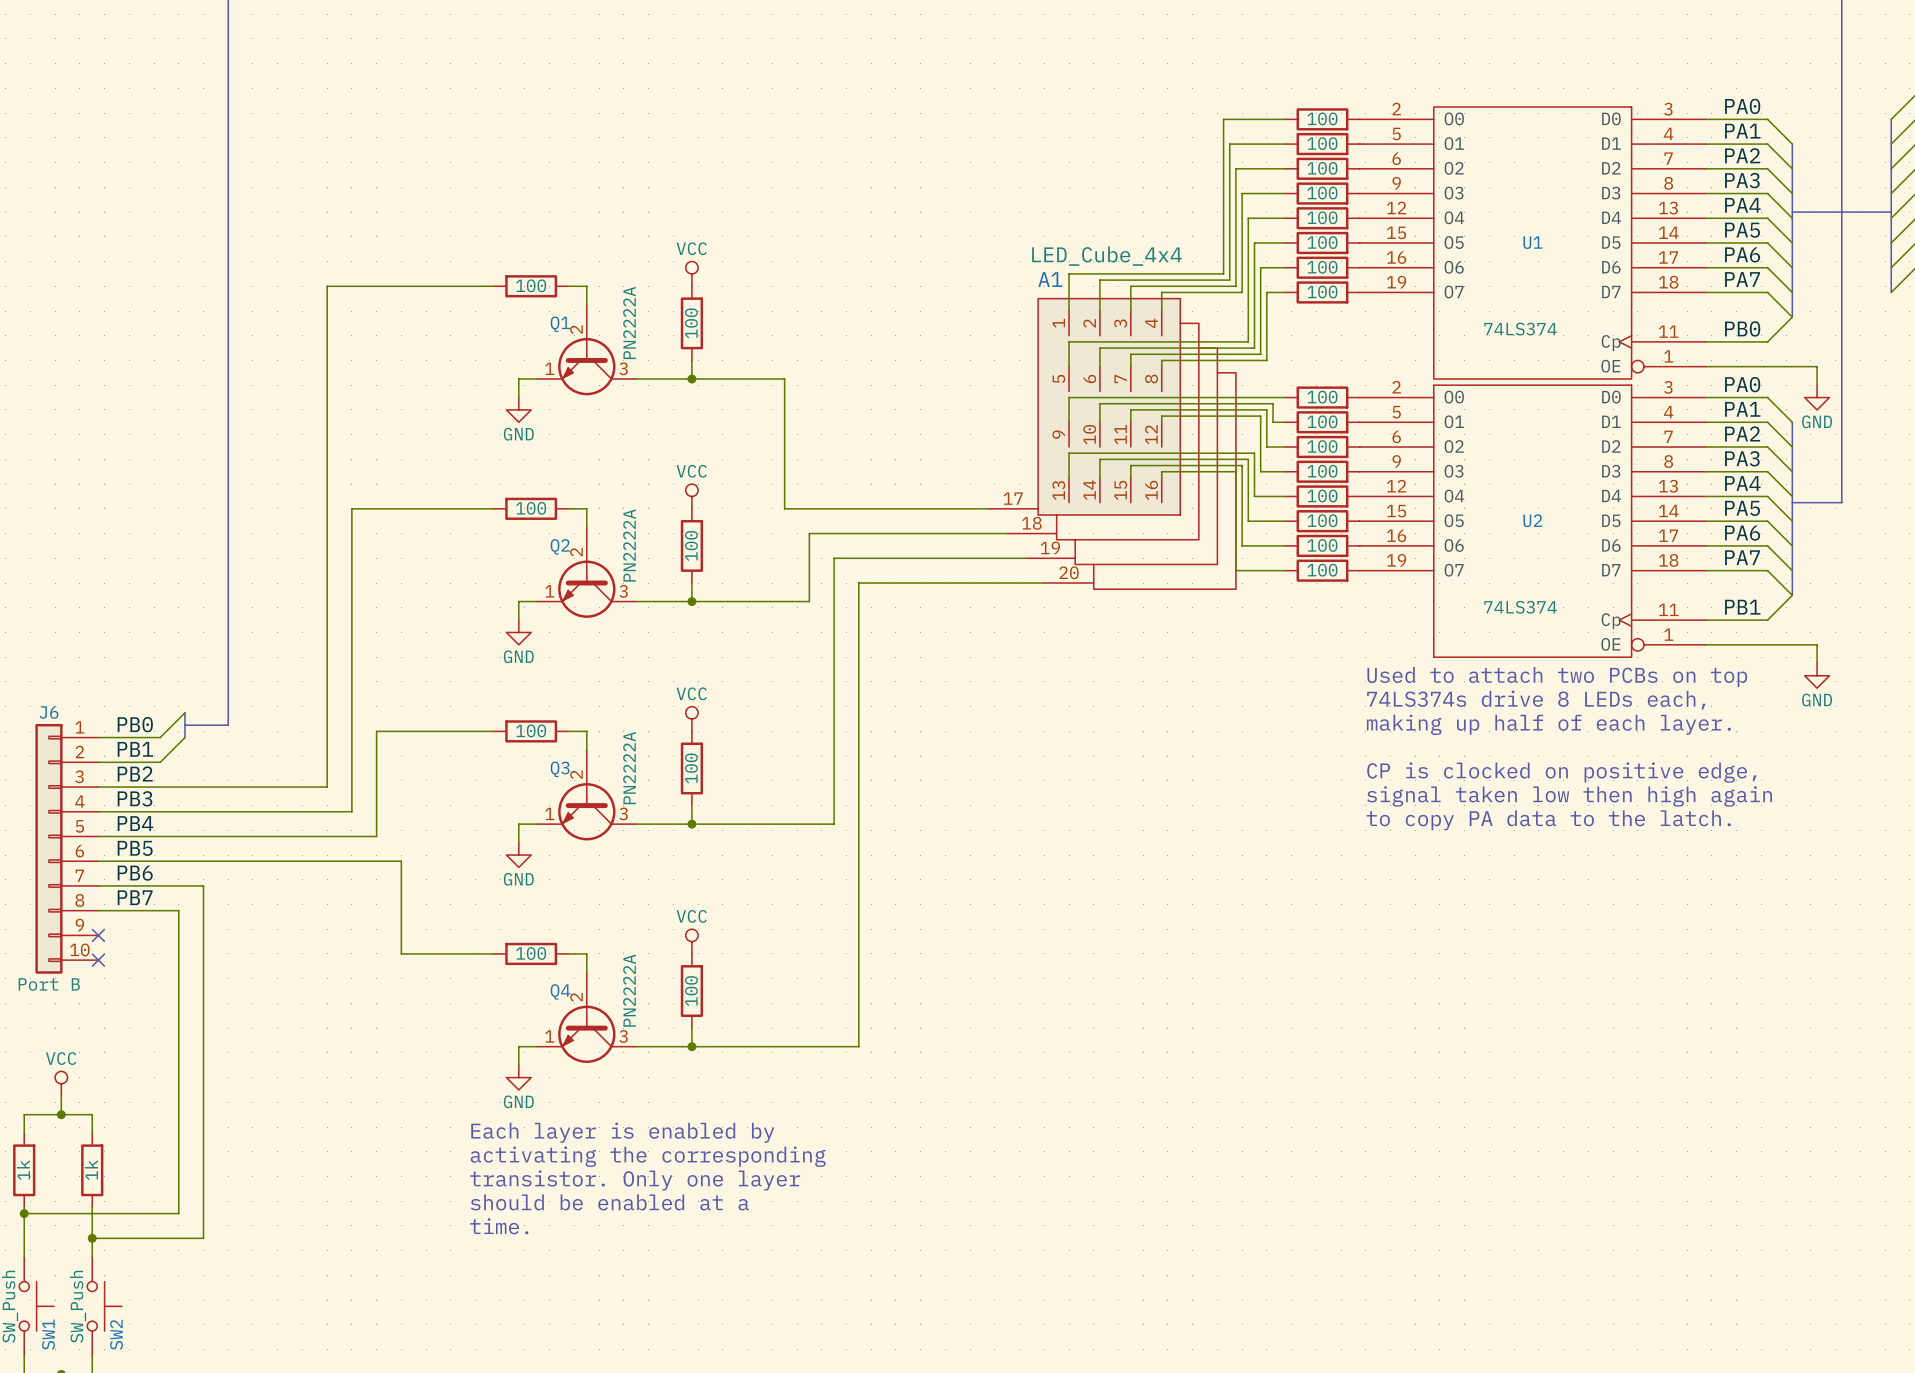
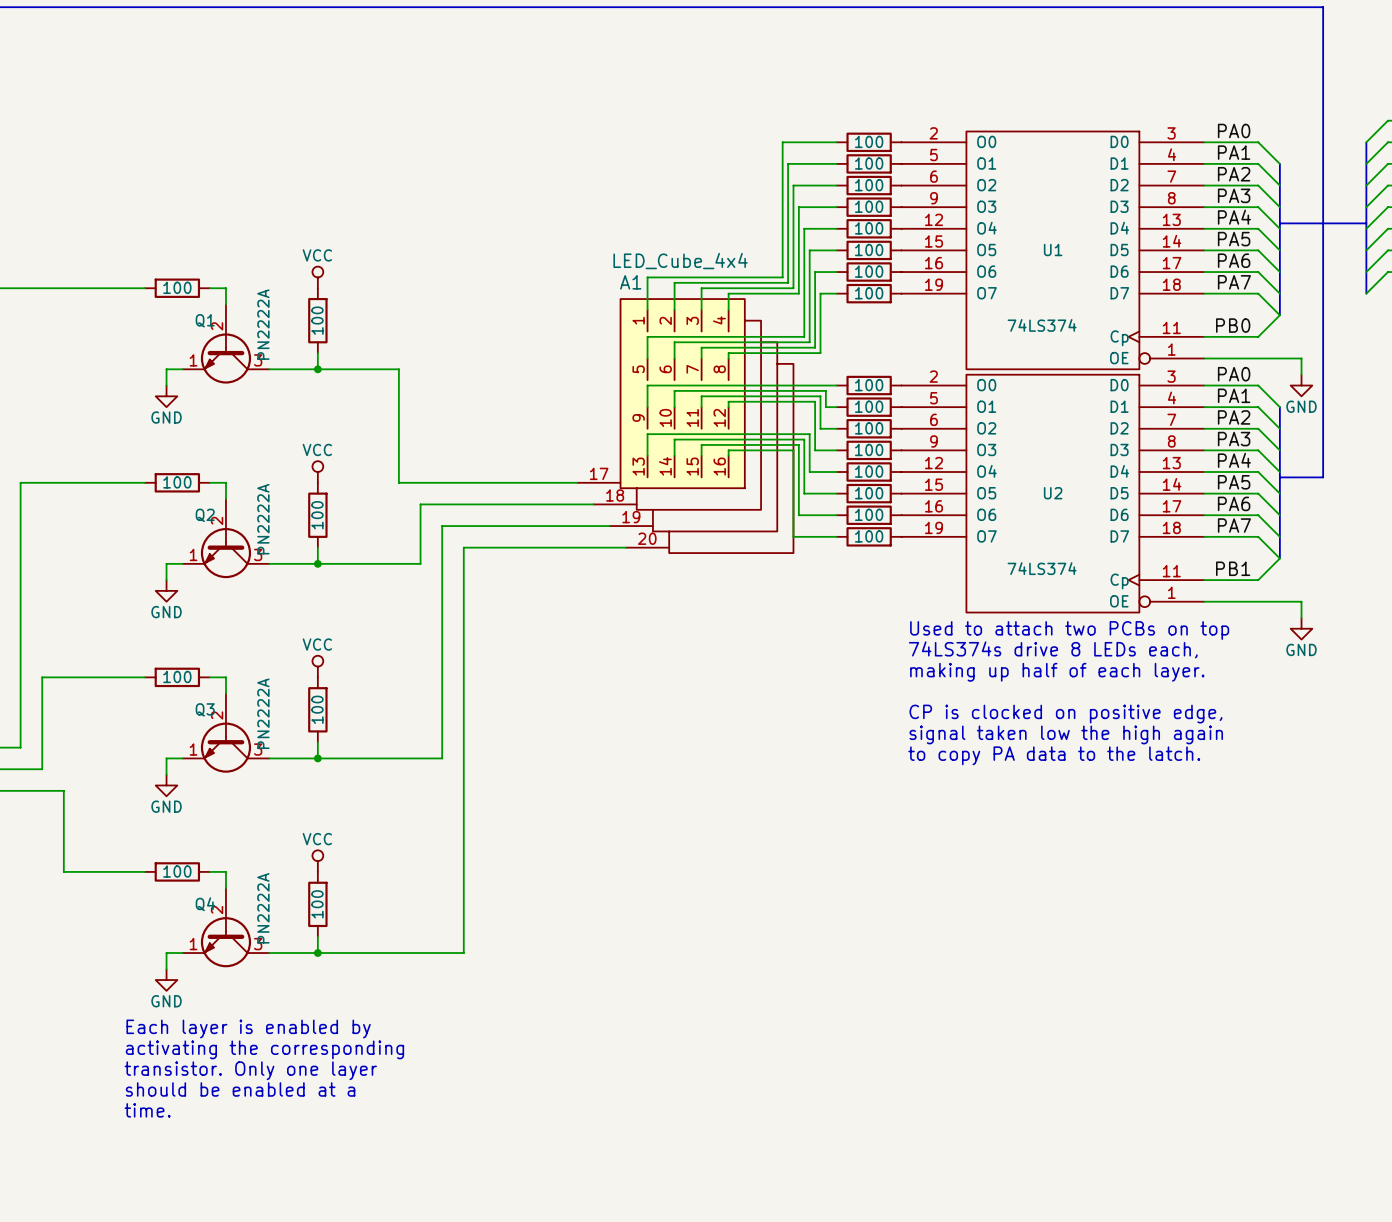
text: signal taken low then high again (1569, 796) -> signal taken low the high again (1066, 734)

